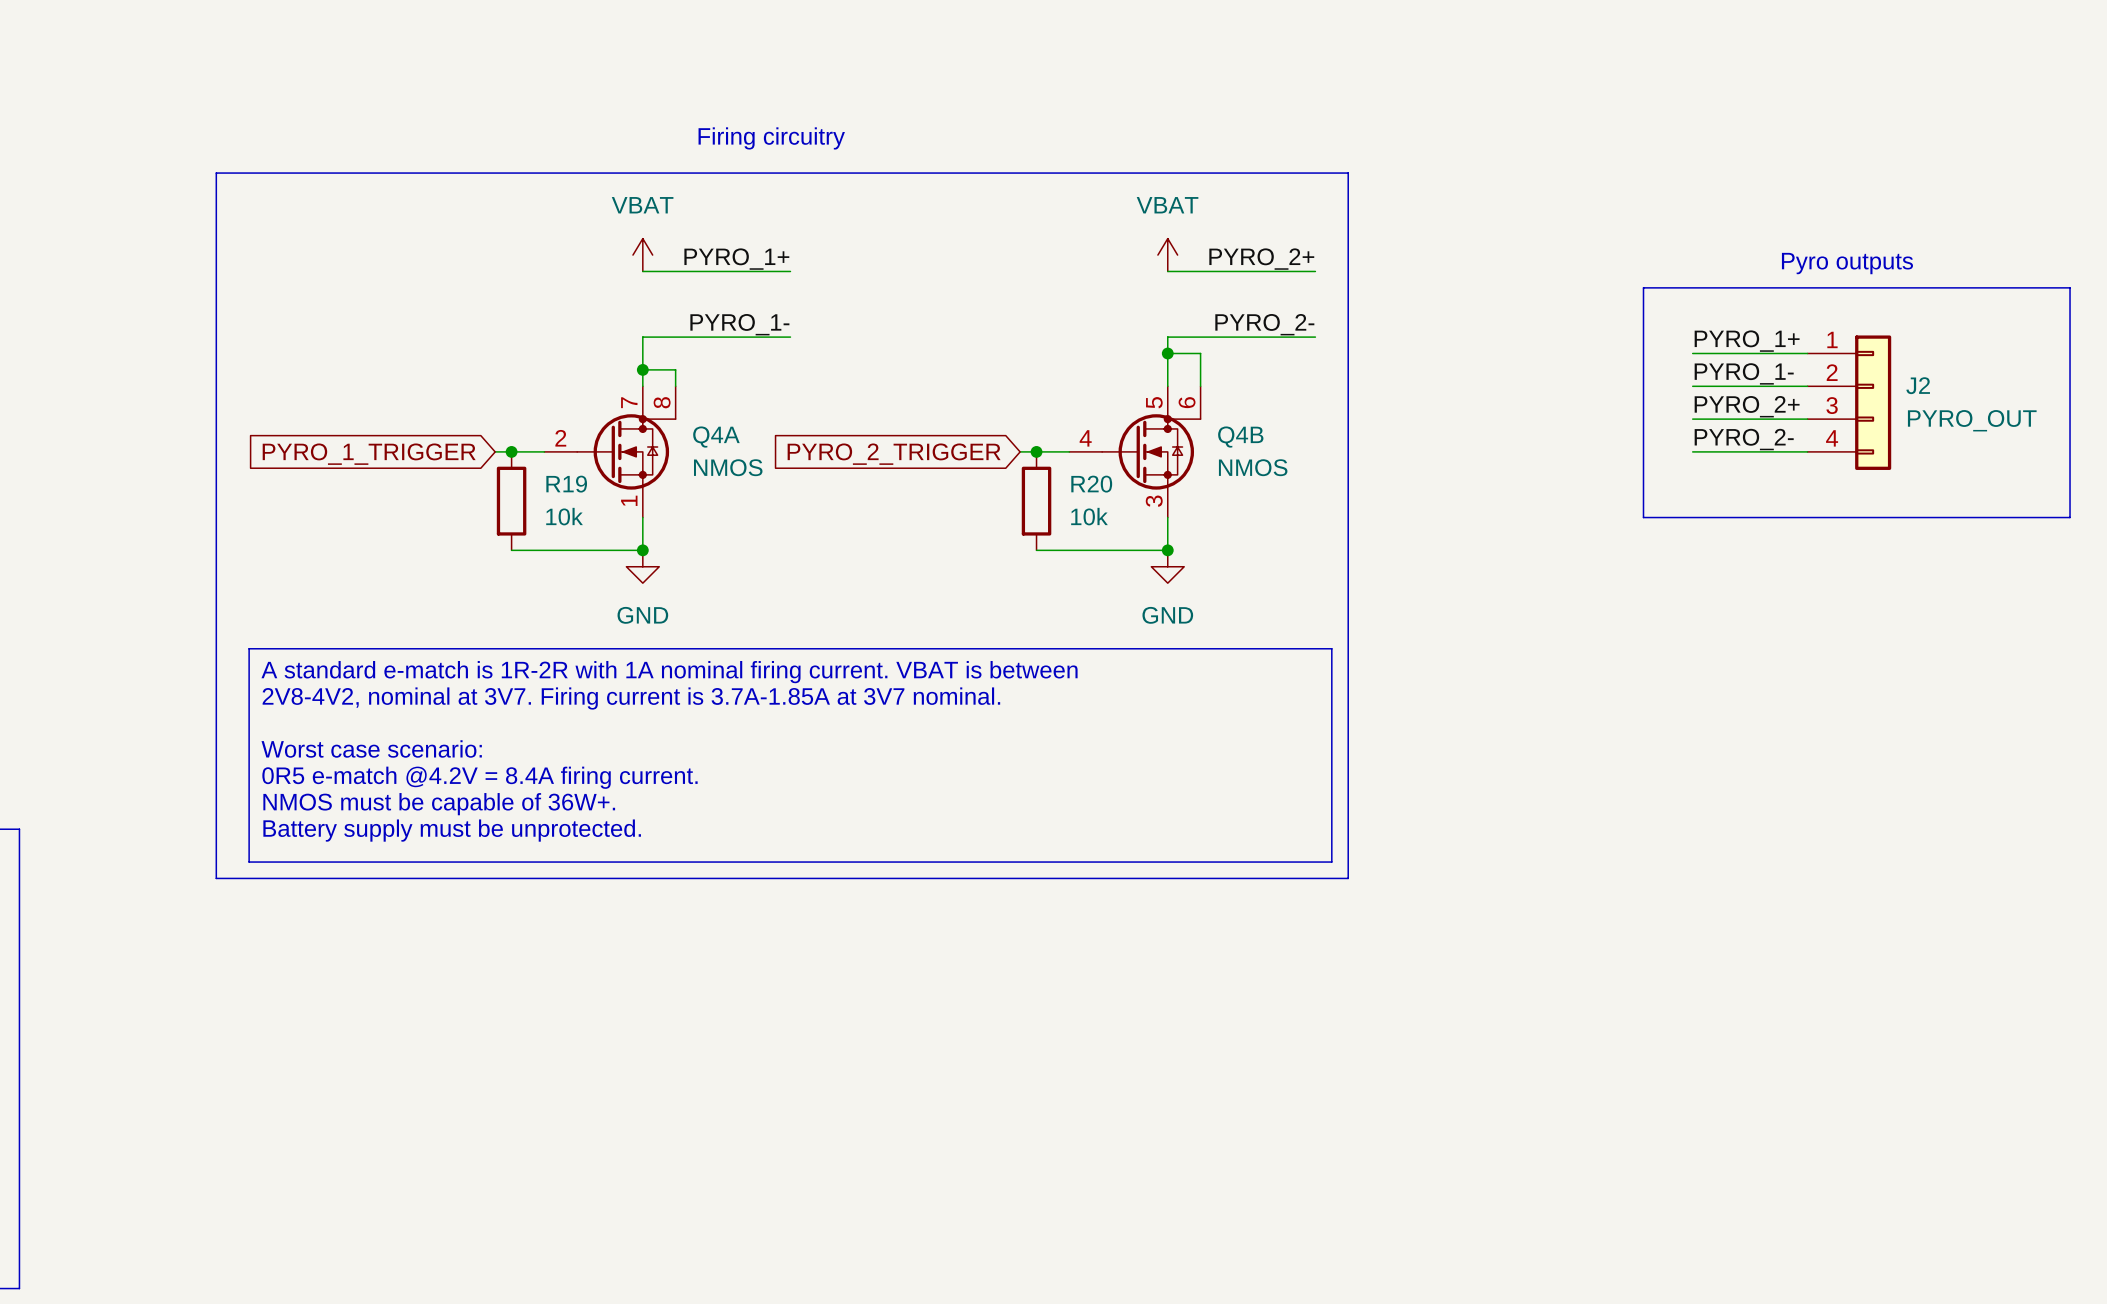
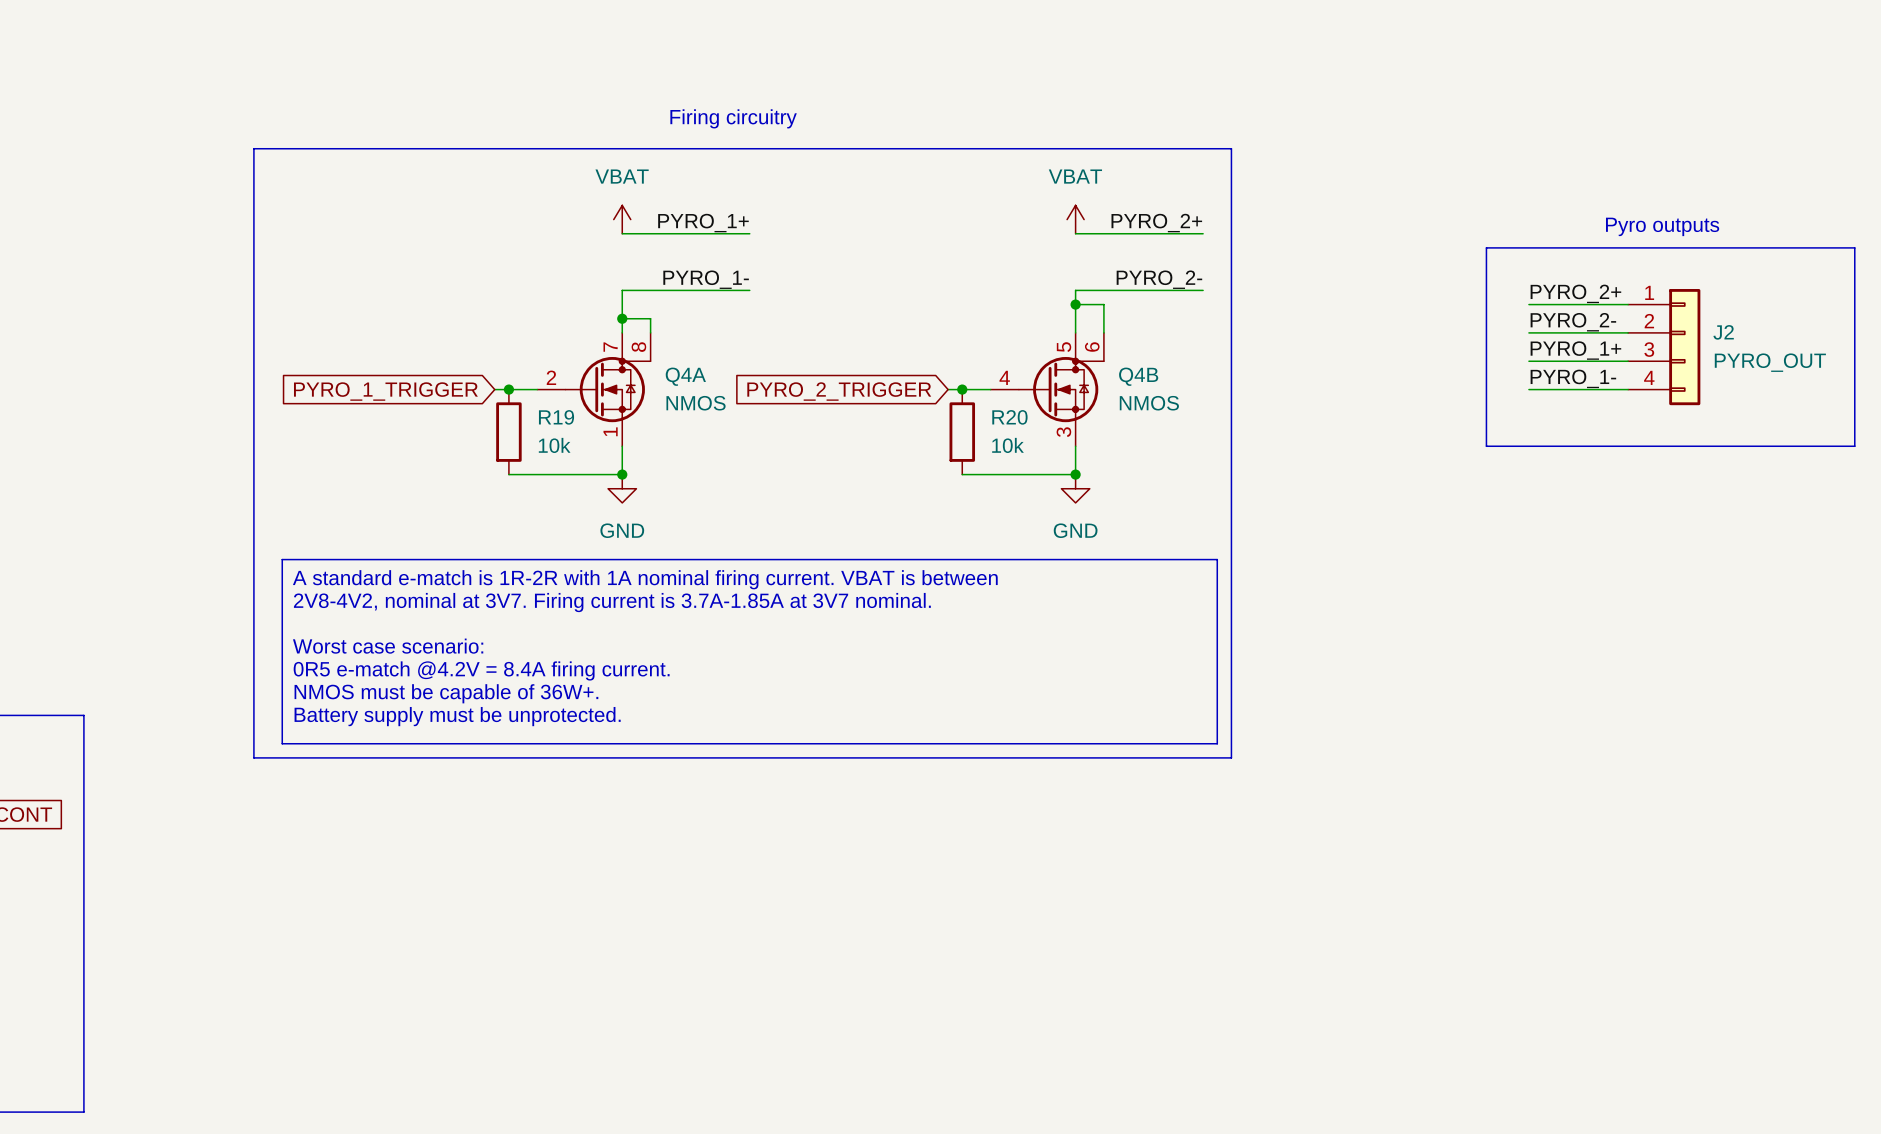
label: PYRO_1+ (1747, 341) -> PYRO_2+ (1575, 293)
label: PYRO_1- (1744, 373) -> PYRO_2- (1573, 322)
label: PYRO_2+ (1747, 406) -> PYRO_1+ (1575, 350)
label: PYRO_2- (1744, 439) -> PYRO_1- (1573, 378)

